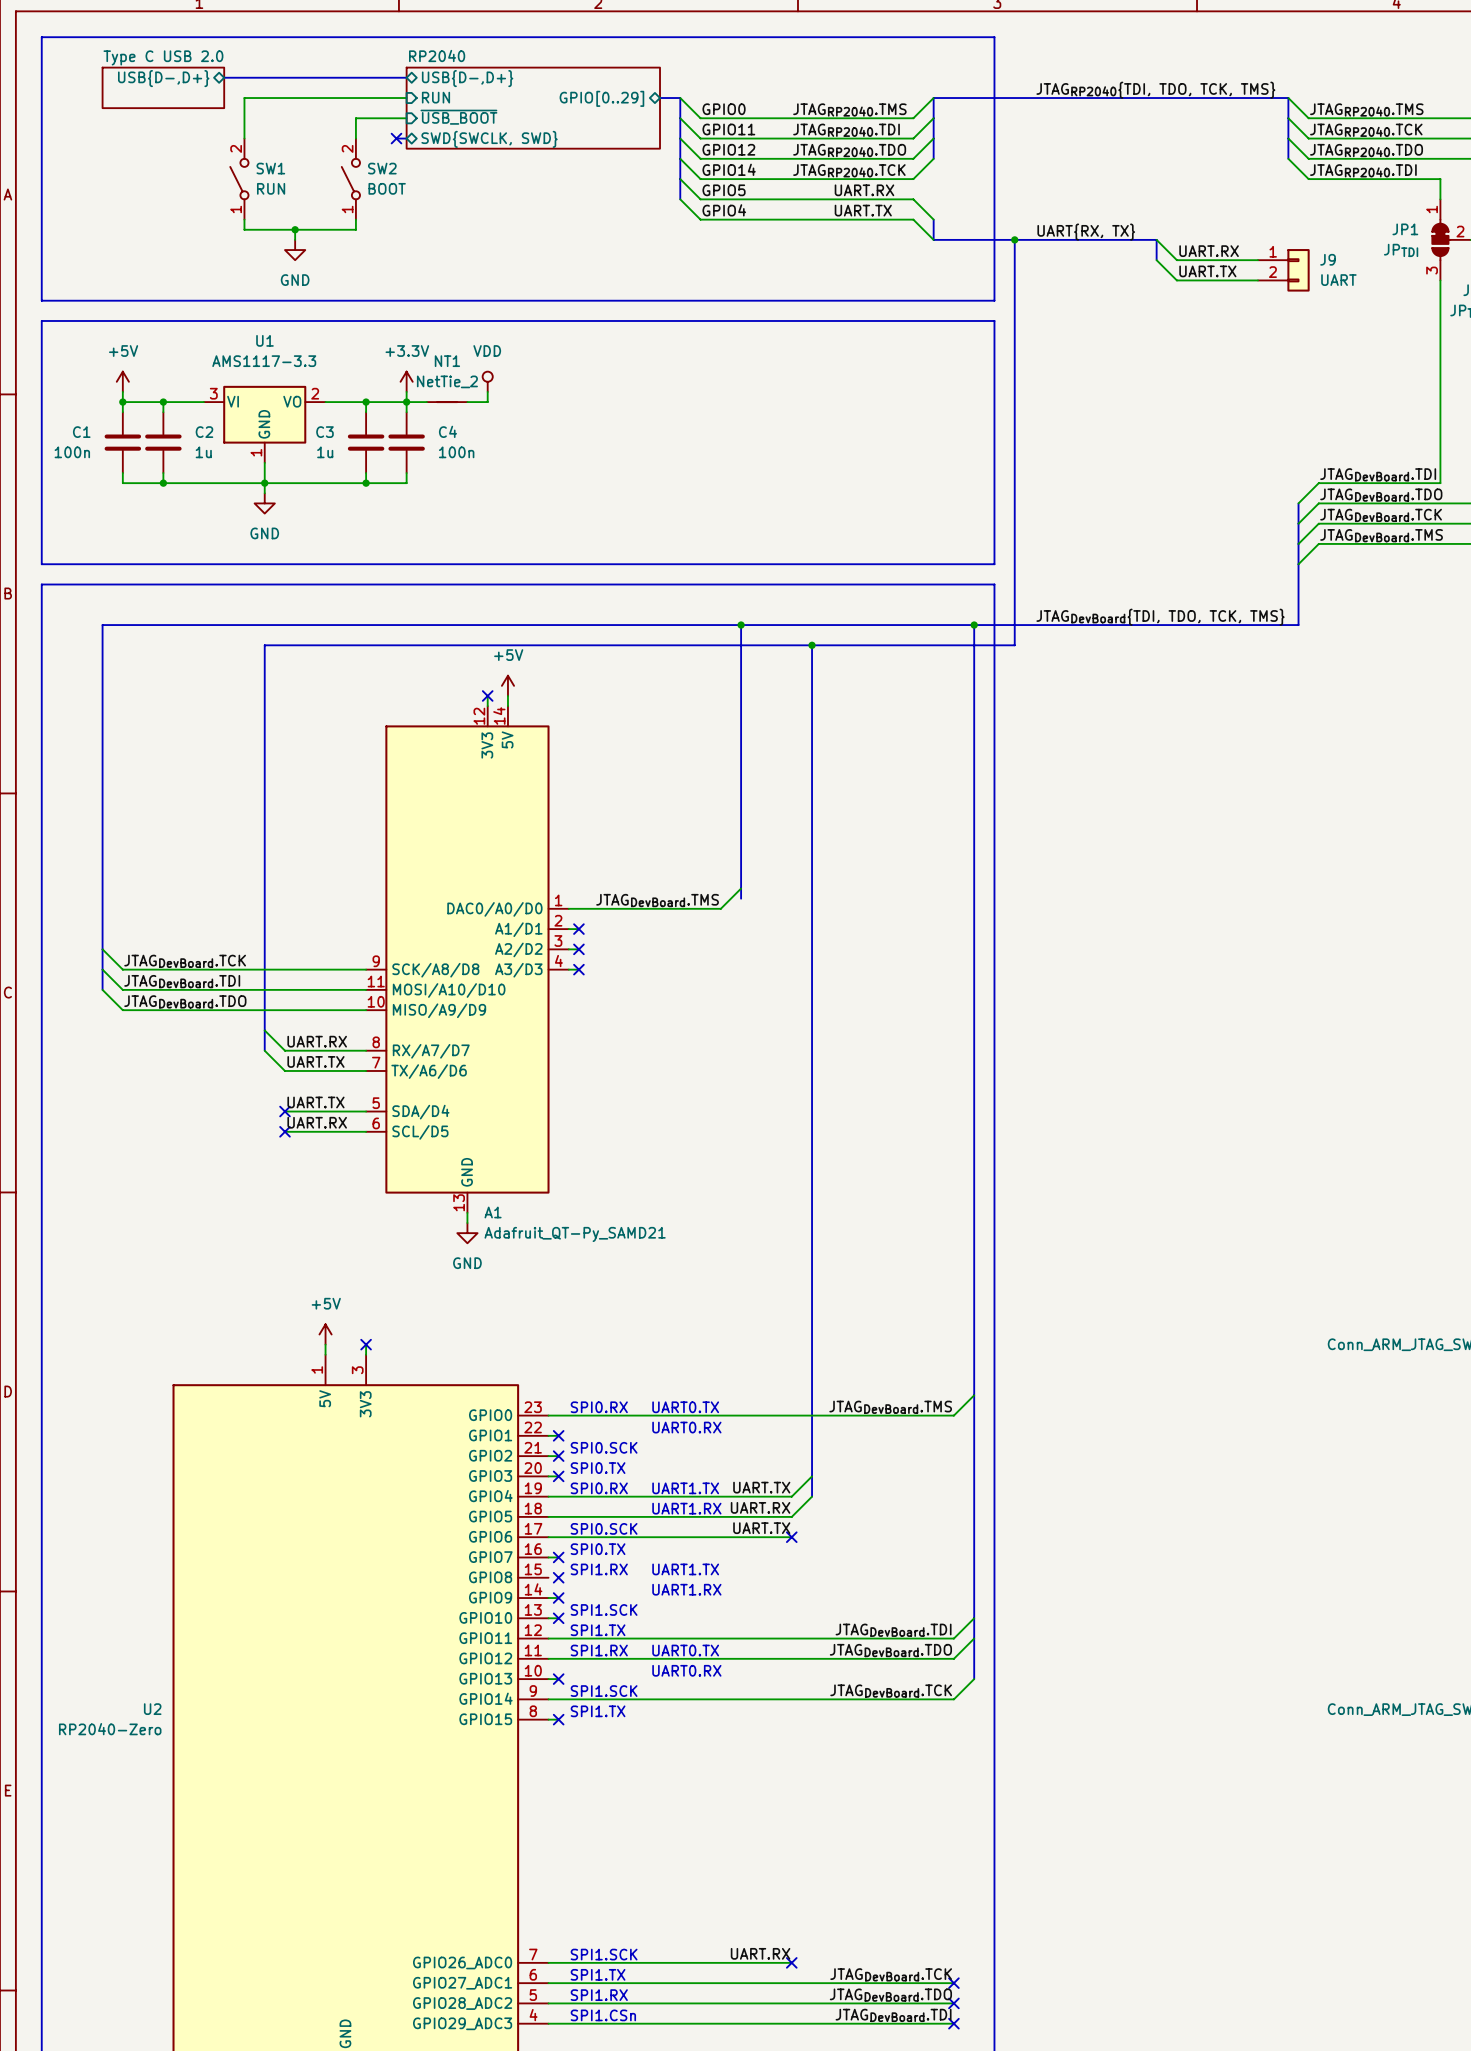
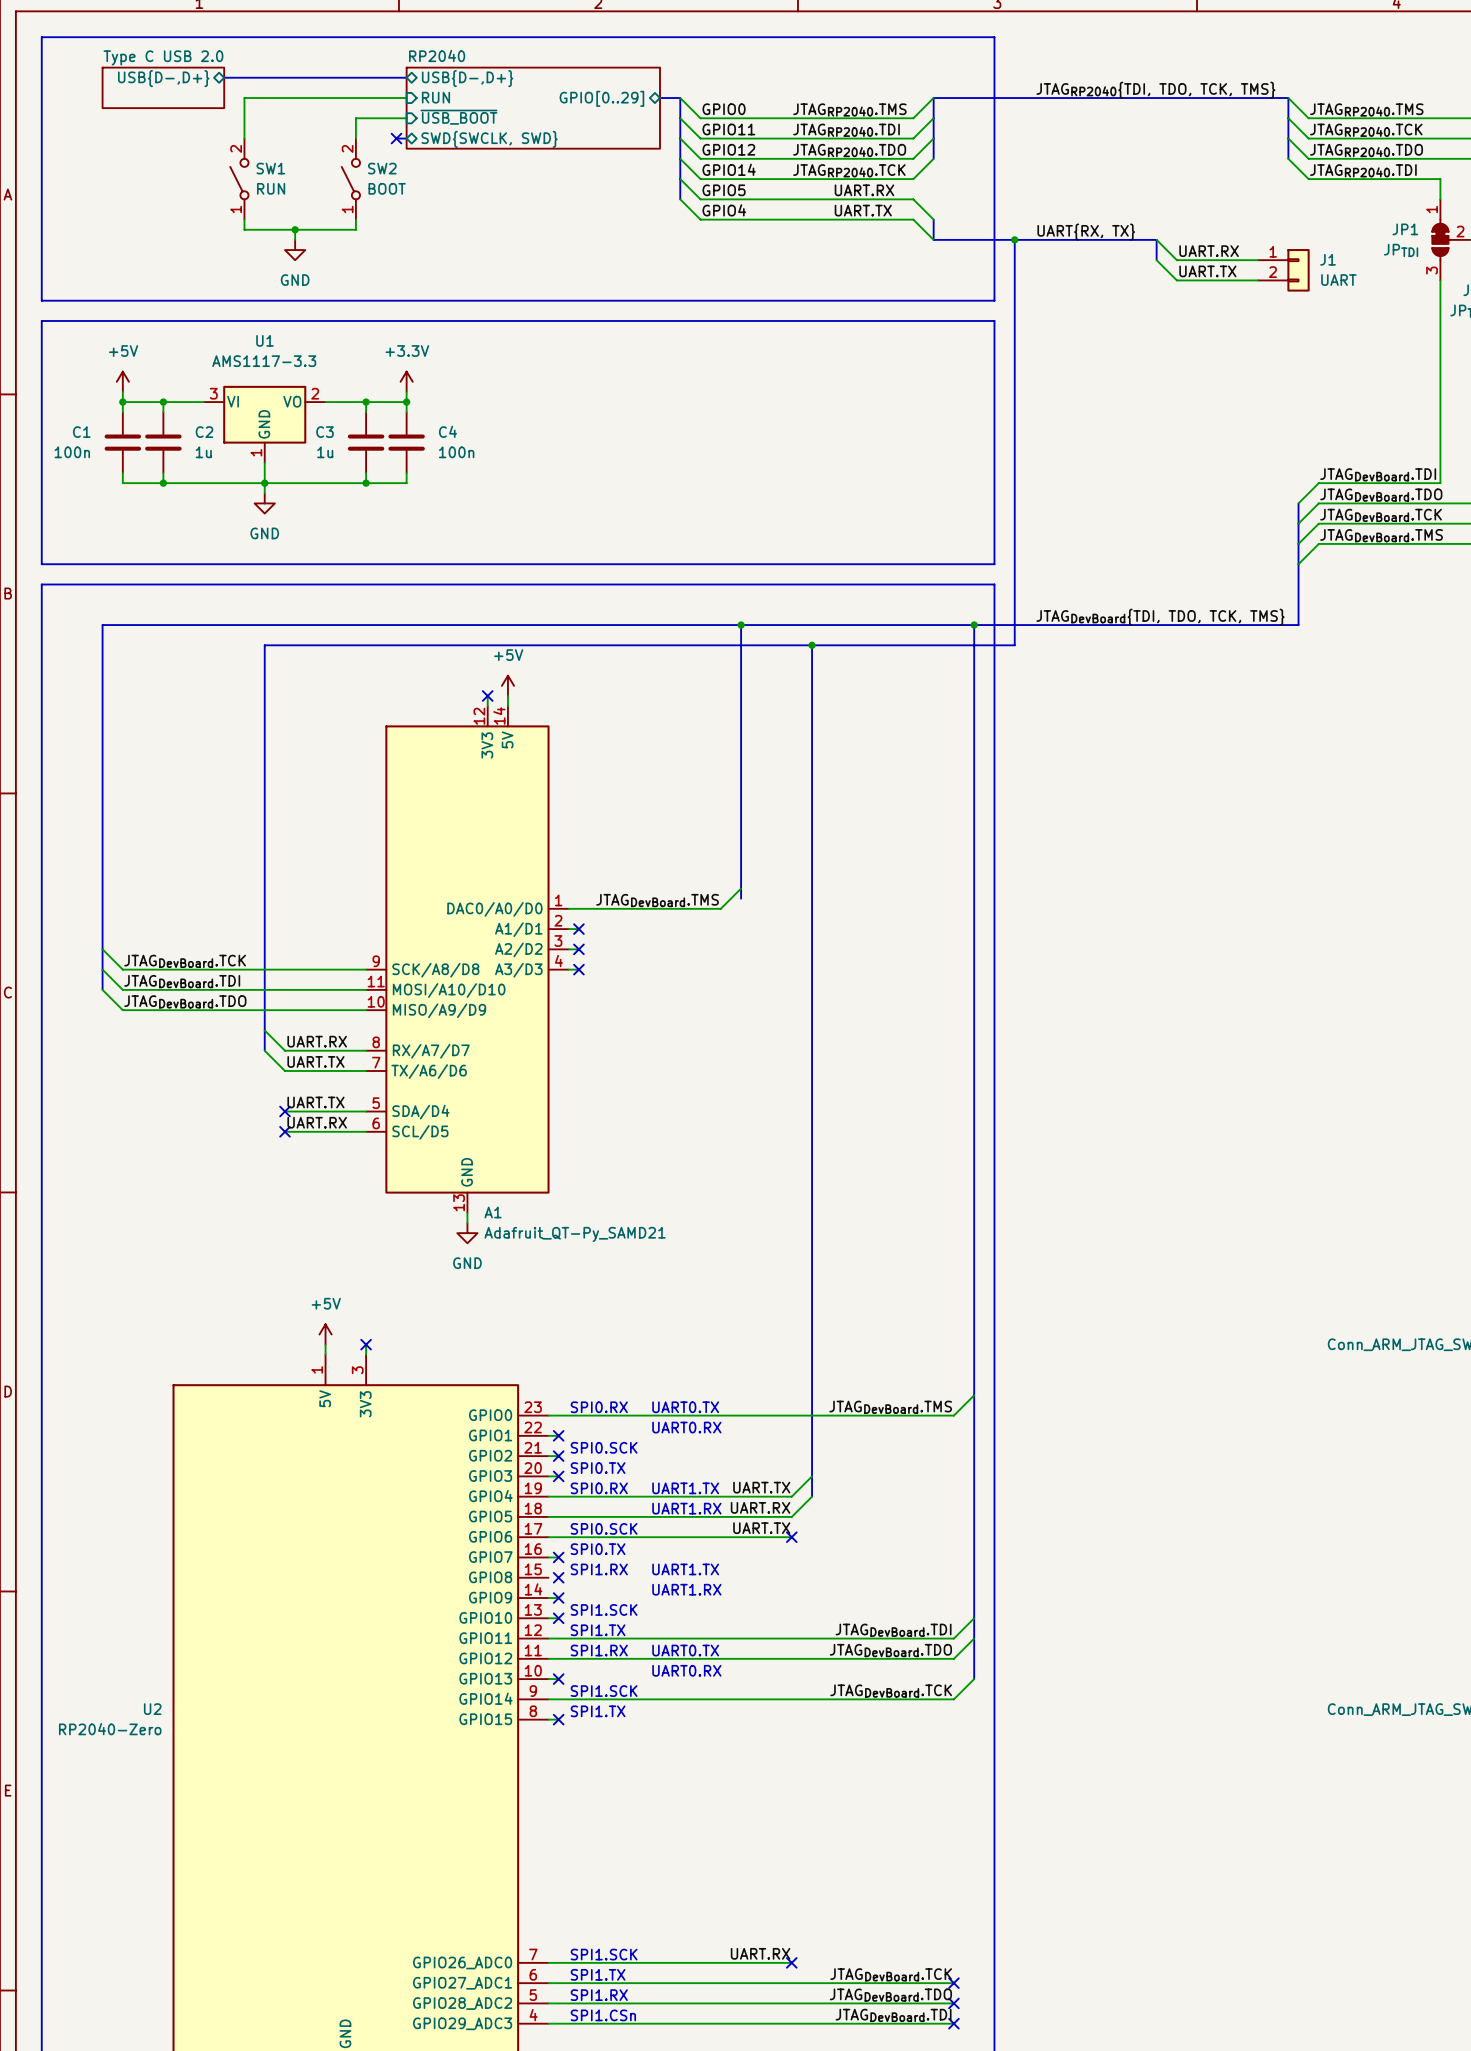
J9 name: J9 (1328, 259) -> J1 (1328, 259)
power symbol: VDD (487, 381) -> none
wire: (487, 391) (487, 402) (467, 402) -> none
wire: (406, 402) (426, 402) -> none
NT1: NetTie_2 (447, 402) -> none

